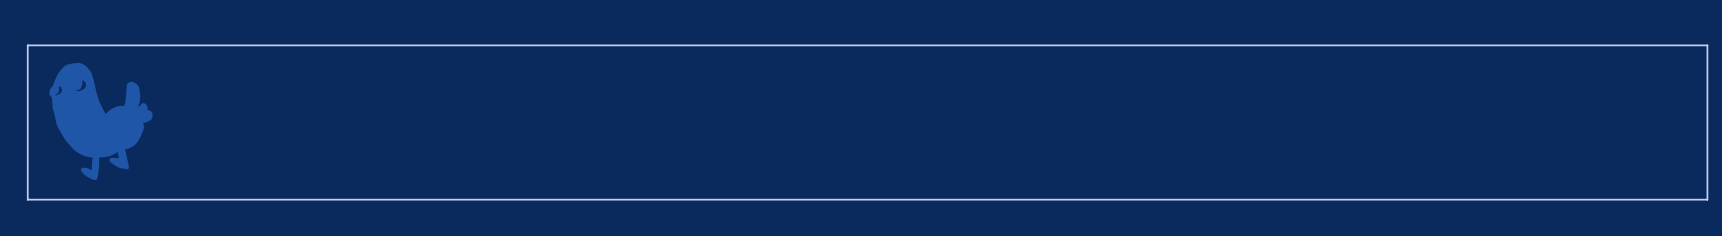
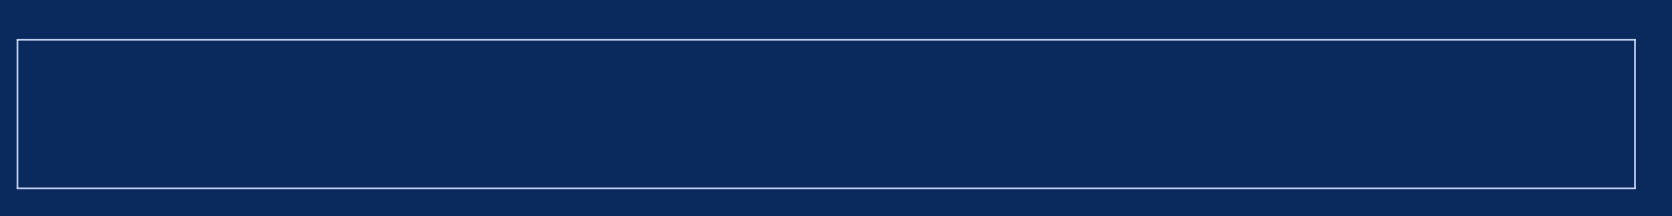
drawing: [49, 62, 153, 180] -> none

